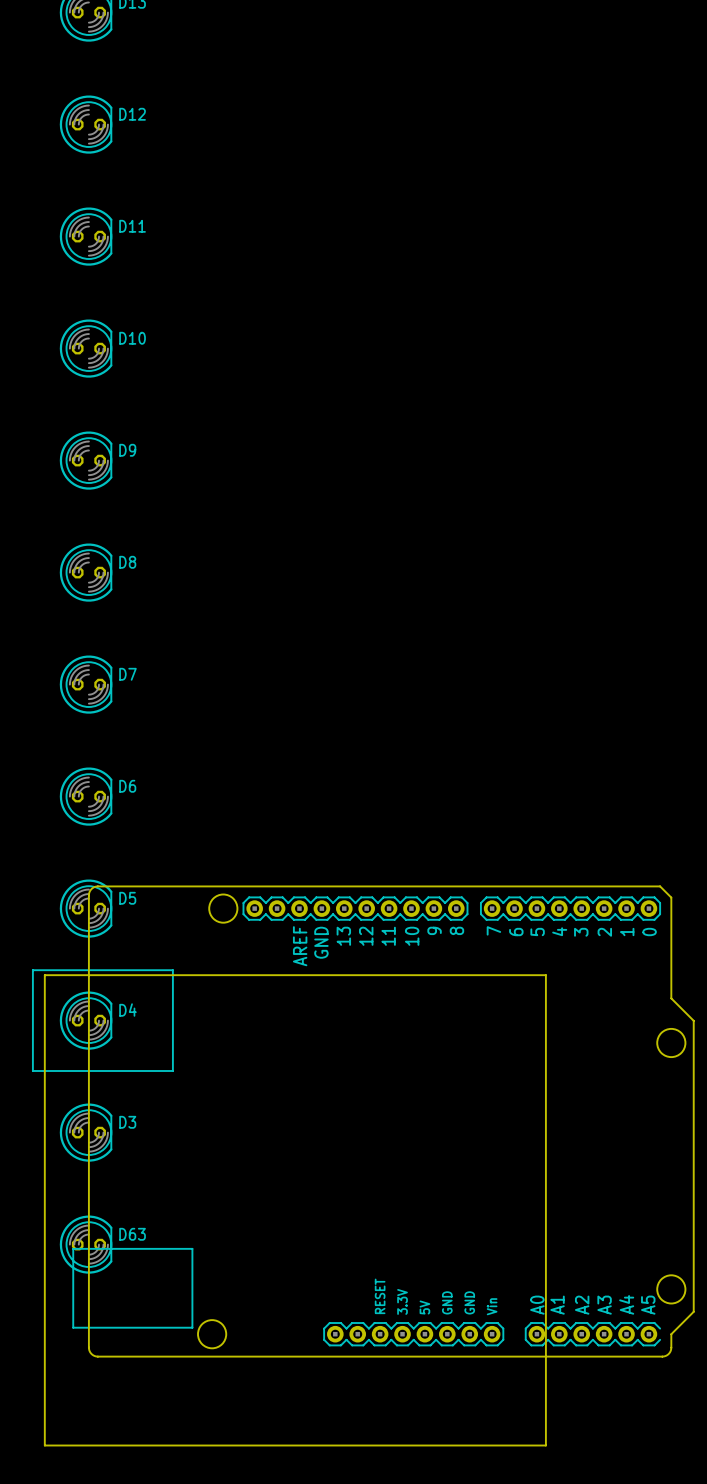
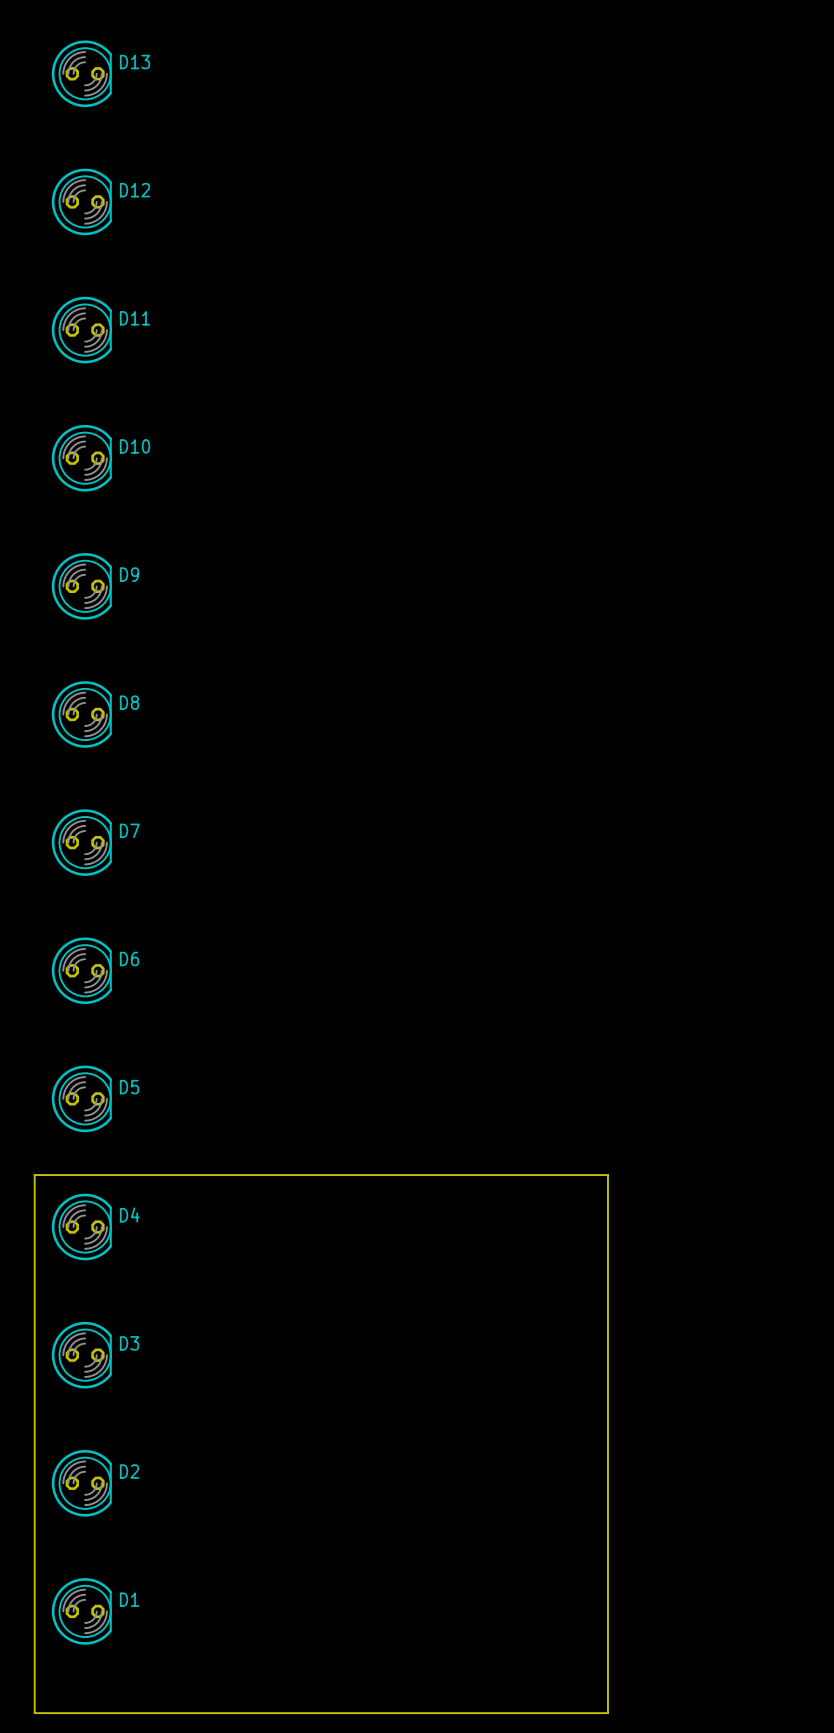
part: (363, 1121) -> none
D63 name: D63 (132, 1234) -> D2 (129, 1471)
D1: none -> (81, 1611)

